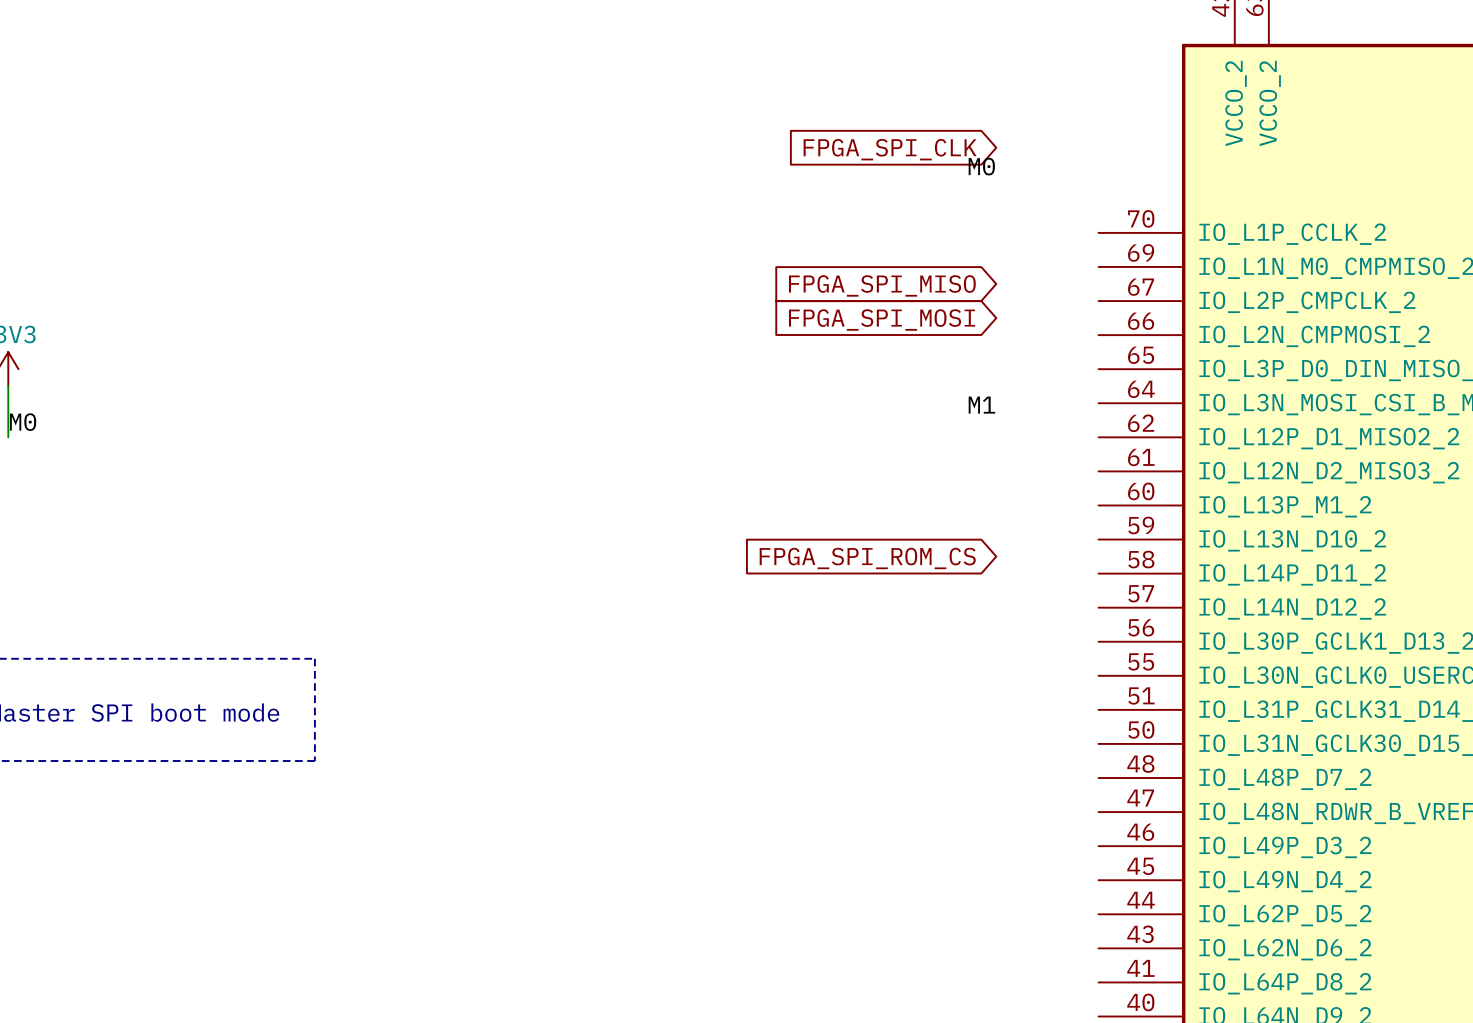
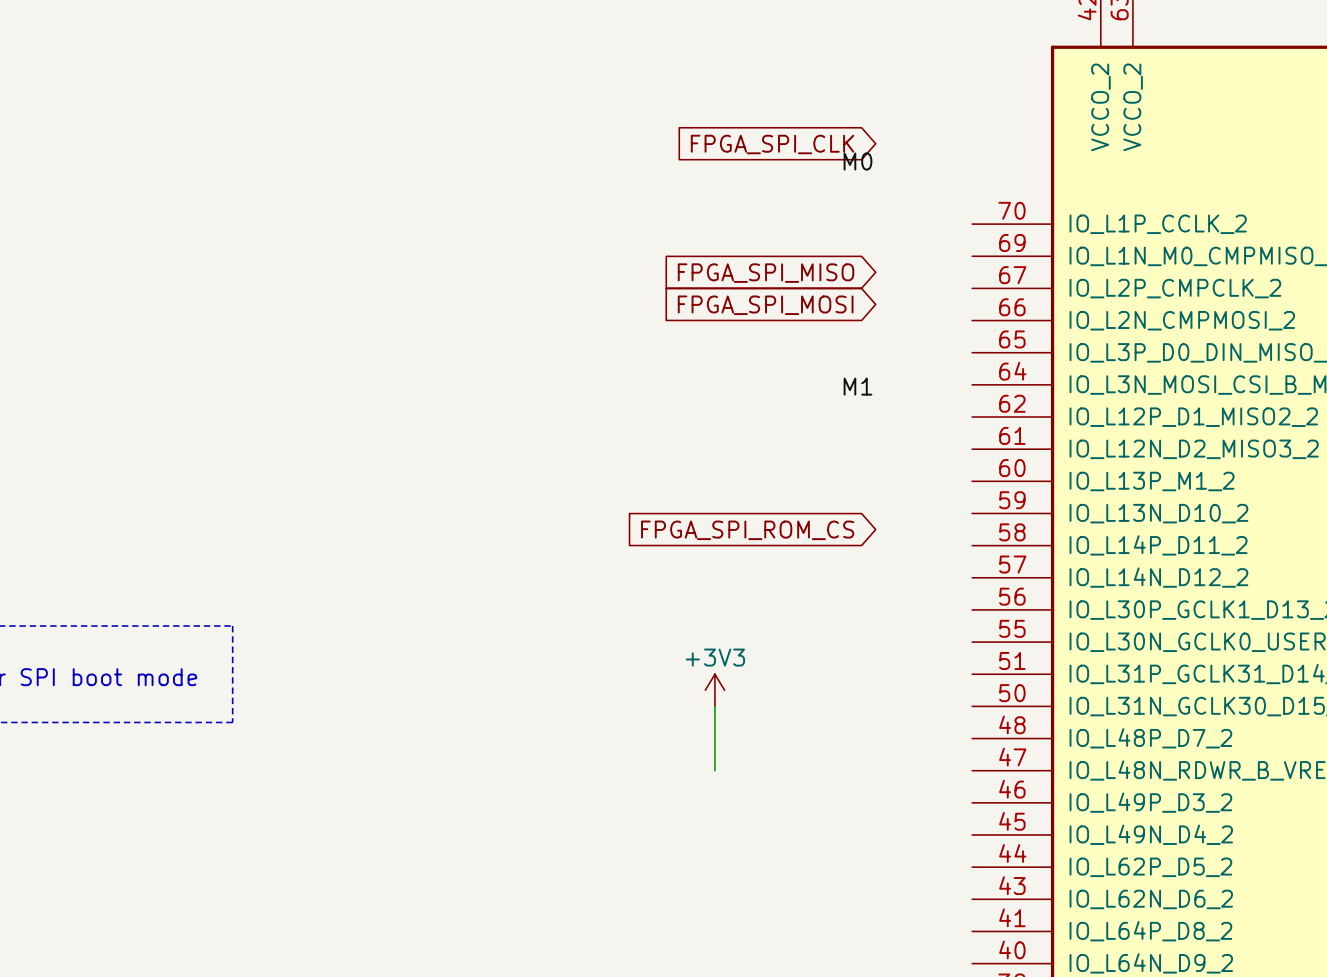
power symbol: none -> +3V3 (714, 690)
wire: none -> (714, 706) (714, 770)

